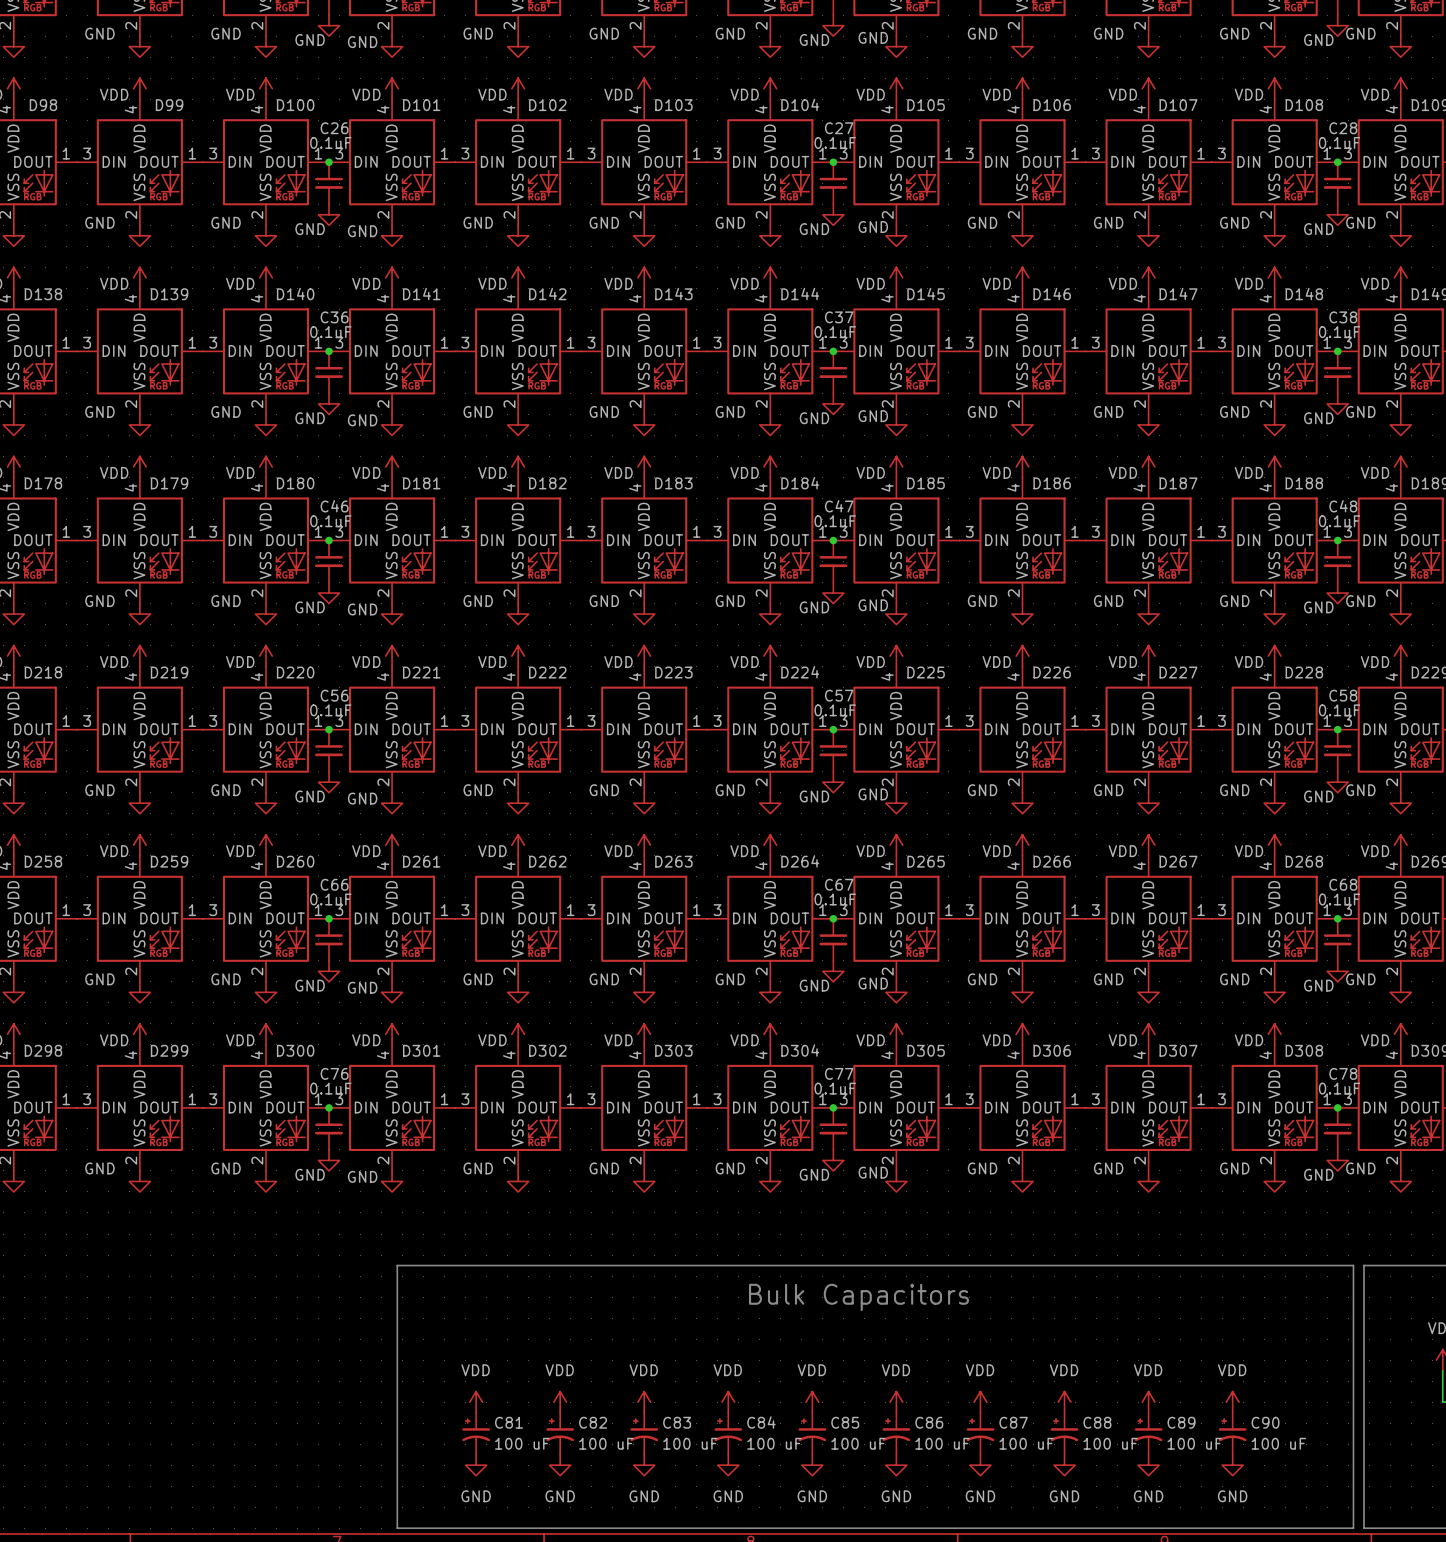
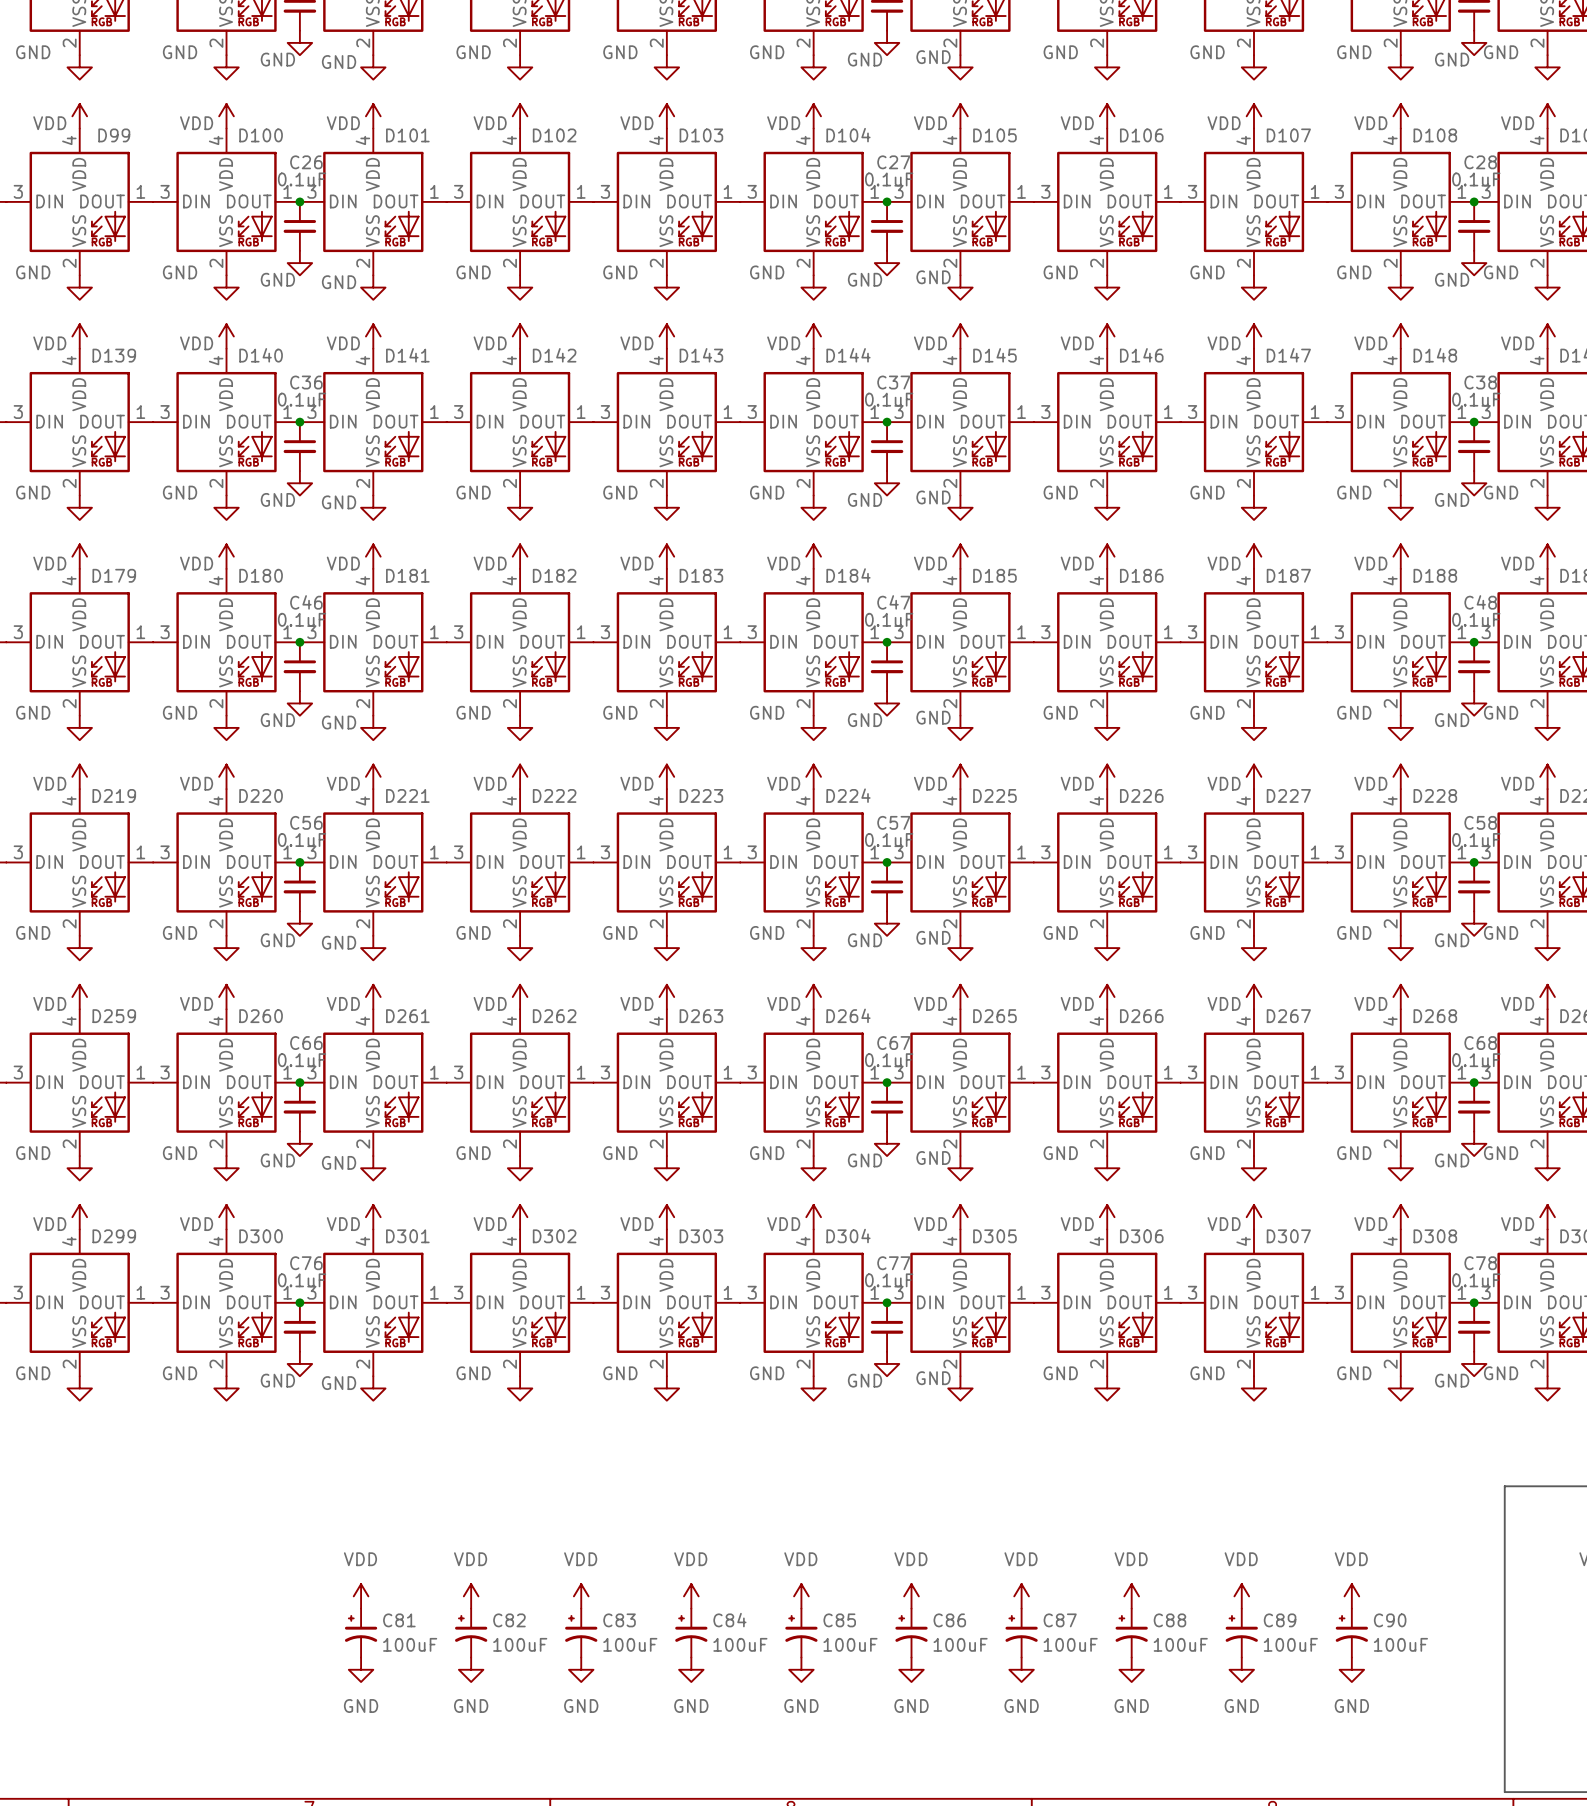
line: (397, 1265) (1353, 1265) (1353, 1528) (397, 1528) (397, 1265) -> none
text: Bulk Capacitors (859, 1297) -> none
power symbol: none -> VDD (361, 1596)
power symbol: none -> VDD (581, 1596)
power symbol: none -> VDD (691, 1596)
power symbol: none -> VDD (801, 1596)
power symbol: none -> VDD (911, 1596)
power symbol: none -> VDD (1021, 1596)
power symbol: none -> VDD (1131, 1596)
power symbol: none -> VDD (1241, 1596)
power symbol position: VDD (476, 1402) -> VDD (471, 1596)
power symbol: VDD (560, 1402) -> none
power symbol: VDD (644, 1402) -> none
power symbol: VDD (728, 1402) -> none
power symbol: VDD (812, 1402) -> none
power symbol: VDD (896, 1402) -> none
power symbol: VDD (980, 1402) -> none
power symbol: VDD (1064, 1402) -> none
power symbol: VDD (1148, 1402) -> none
power symbol position: VDD (1232, 1402) -> VDD (1351, 1596)
power symbol: none -> GND (361, 1669)
power symbol: none -> GND (581, 1669)
power symbol: none -> GND (691, 1669)
power symbol: none -> GND (801, 1669)
power symbol: none -> GND (911, 1669)
power symbol: none -> GND (1021, 1669)
power symbol: none -> GND (1131, 1669)
power symbol: none -> GND (1241, 1669)
C81 position: (476, 1433) -> (361, 1633)
C82 position: (560, 1433) -> (471, 1633)
C83 position: (644, 1433) -> (581, 1633)
C84 position: (728, 1433) -> (691, 1633)
C85 position: (812, 1433) -> (801, 1633)
C86 position: (896, 1433) -> (911, 1633)
C87 position: (980, 1433) -> (1021, 1633)
C88 position: (1064, 1433) -> (1131, 1633)
C89 position: (1148, 1433) -> (1241, 1633)
C90 position: (1232, 1433) -> (1351, 1633)
C81 value: 100 uF (522, 1443) -> 100uF (410, 1644)
C82 value: 100 uF (606, 1443) -> 100uF (520, 1644)
C83 value: 100 uF (690, 1443) -> 100uF (630, 1644)
C84 value: 100 uF (774, 1443) -> 100uF (740, 1644)
C85 value: 100 uF (858, 1443) -> 100uF (850, 1644)
C86 value: 100 uF (942, 1443) -> 100uF (960, 1644)
C87 value: 100 uF (1026, 1443) -> 100uF (1070, 1644)
C88 value: 100 uF (1110, 1443) -> 100uF (1180, 1644)
C89 value: 100 uF (1194, 1443) -> 100uF (1290, 1644)
C90 value: 100 uF (1278, 1443) -> 100uF (1400, 1644)
power symbol position: GND (476, 1465) -> GND (471, 1669)
power symbol: GND (560, 1465) -> none
power symbol: GND (644, 1465) -> none
power symbol: GND (728, 1465) -> none
power symbol: GND (812, 1465) -> none
power symbol: GND (896, 1465) -> none
power symbol: GND (980, 1465) -> none
power symbol: GND (1064, 1465) -> none
power symbol: GND (1148, 1465) -> none
power symbol position: GND (1232, 1465) -> GND (1351, 1669)

